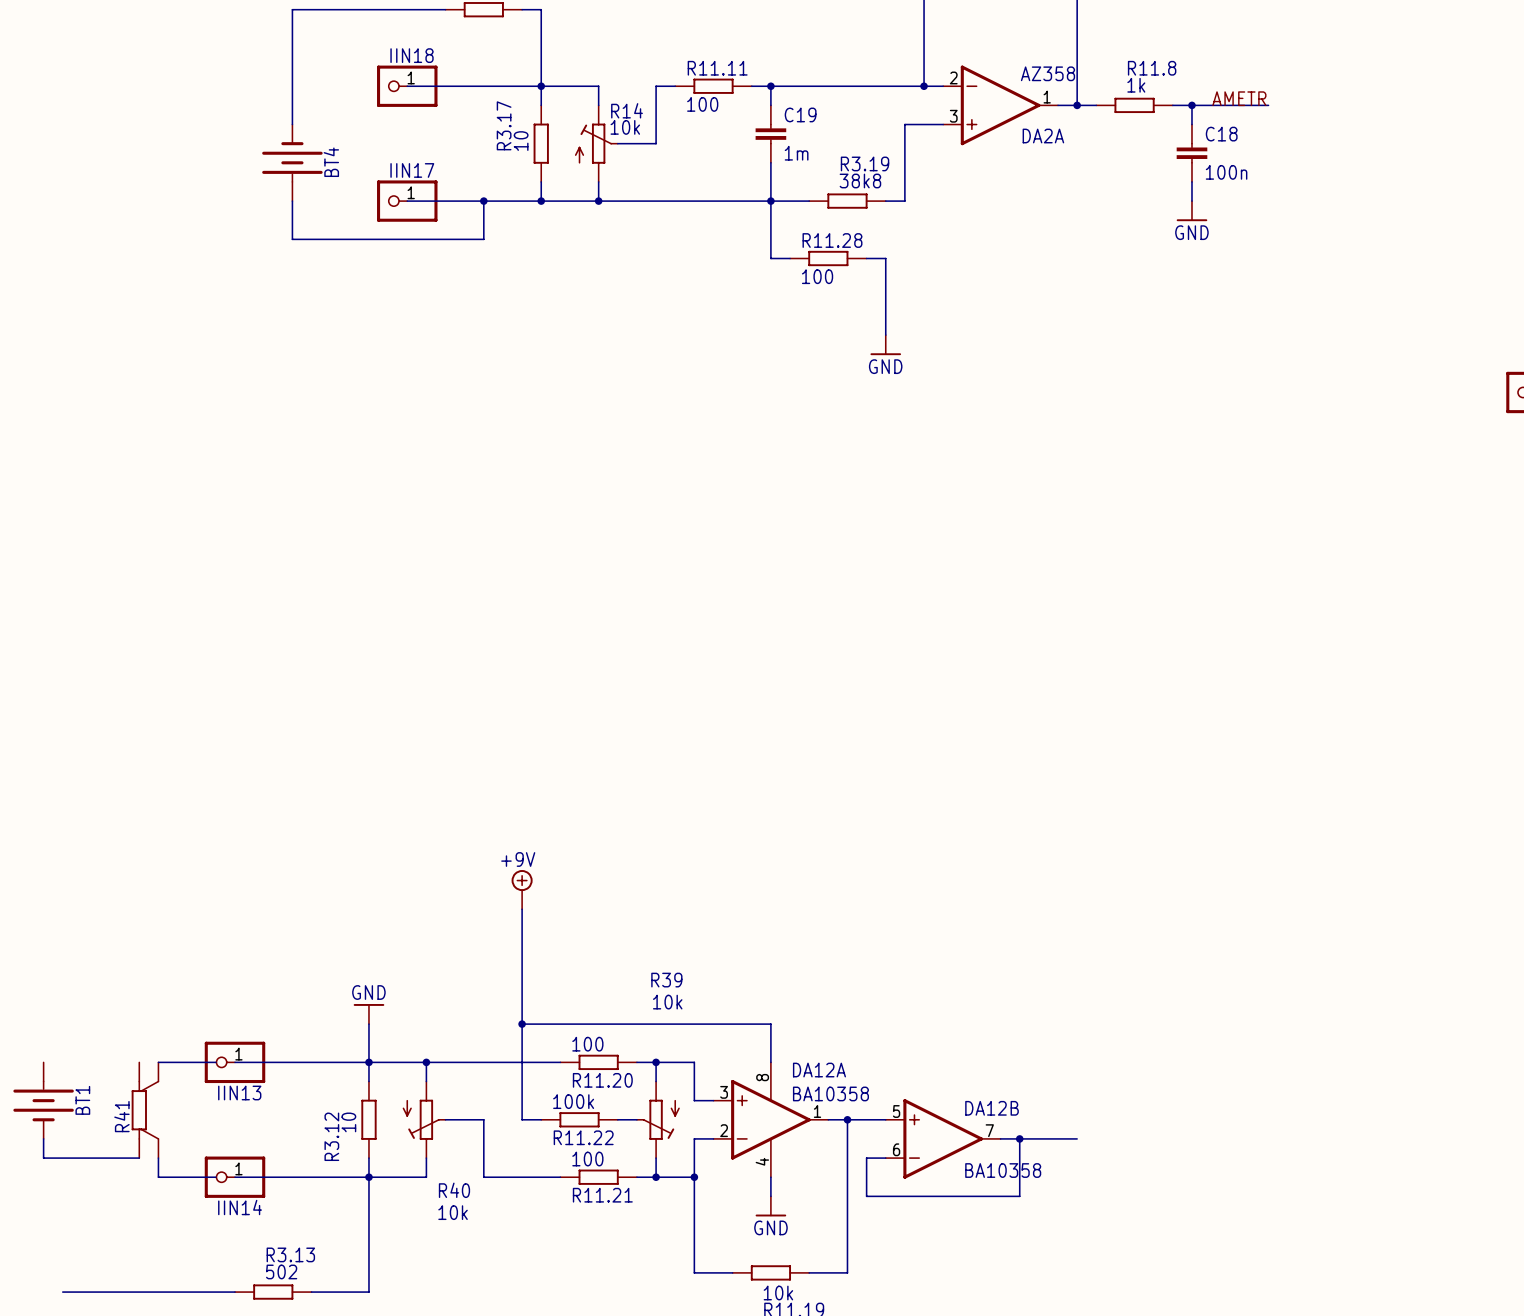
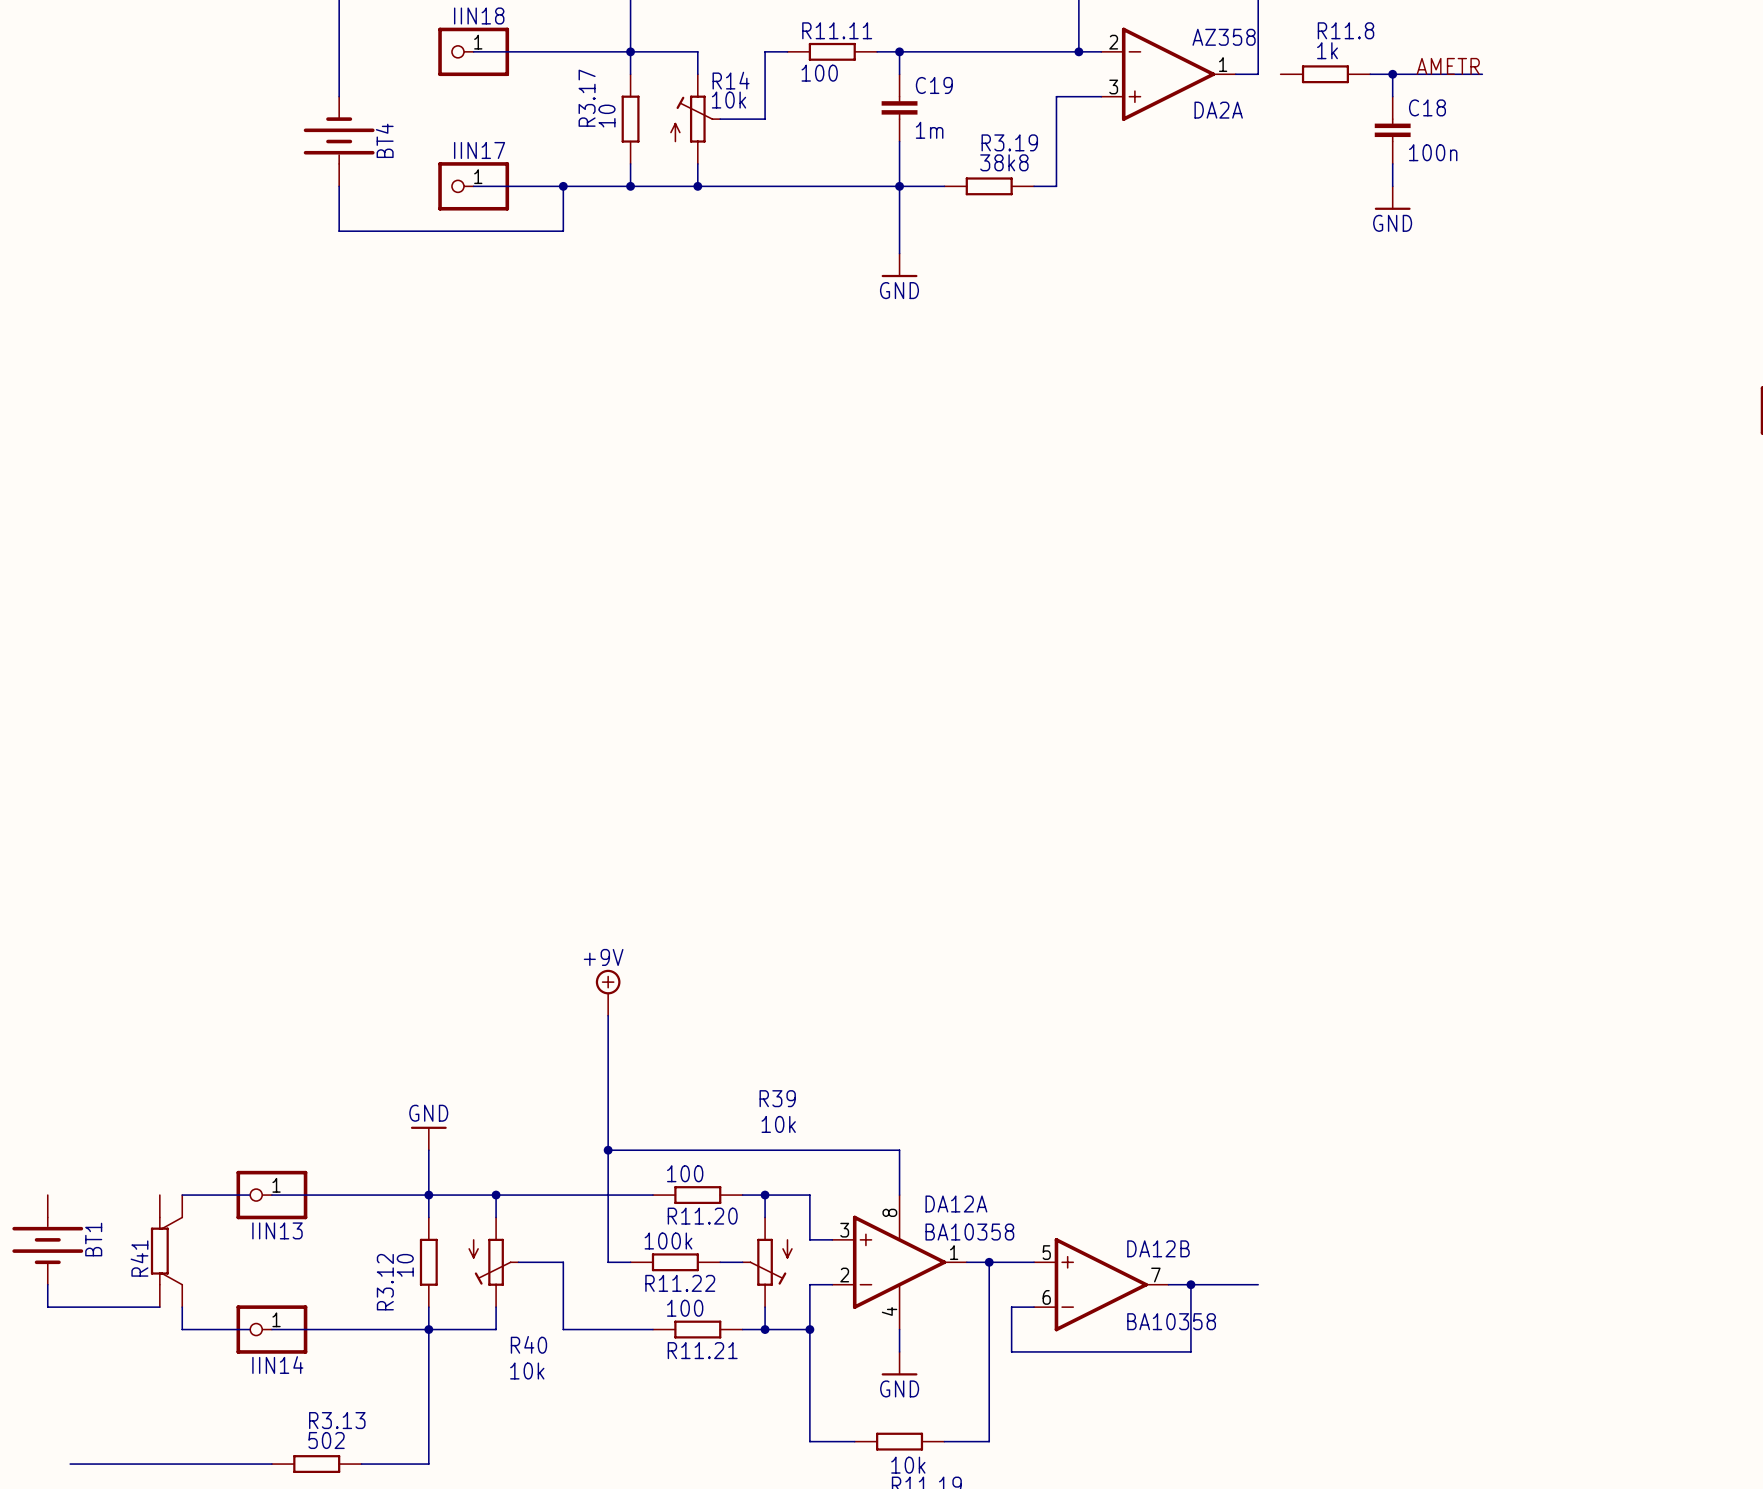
wire: (1077, 105) (1096, 105) -> none
junction: (1077, 105) -> none
wire: (770, 258) (790, 258) -> none
R11.28: 100 (828, 258) -> none
wire: (866, 258) (885, 258) (885, 335) -> none
power symbol position: GND (885, 345) -> GND (899, 265)

